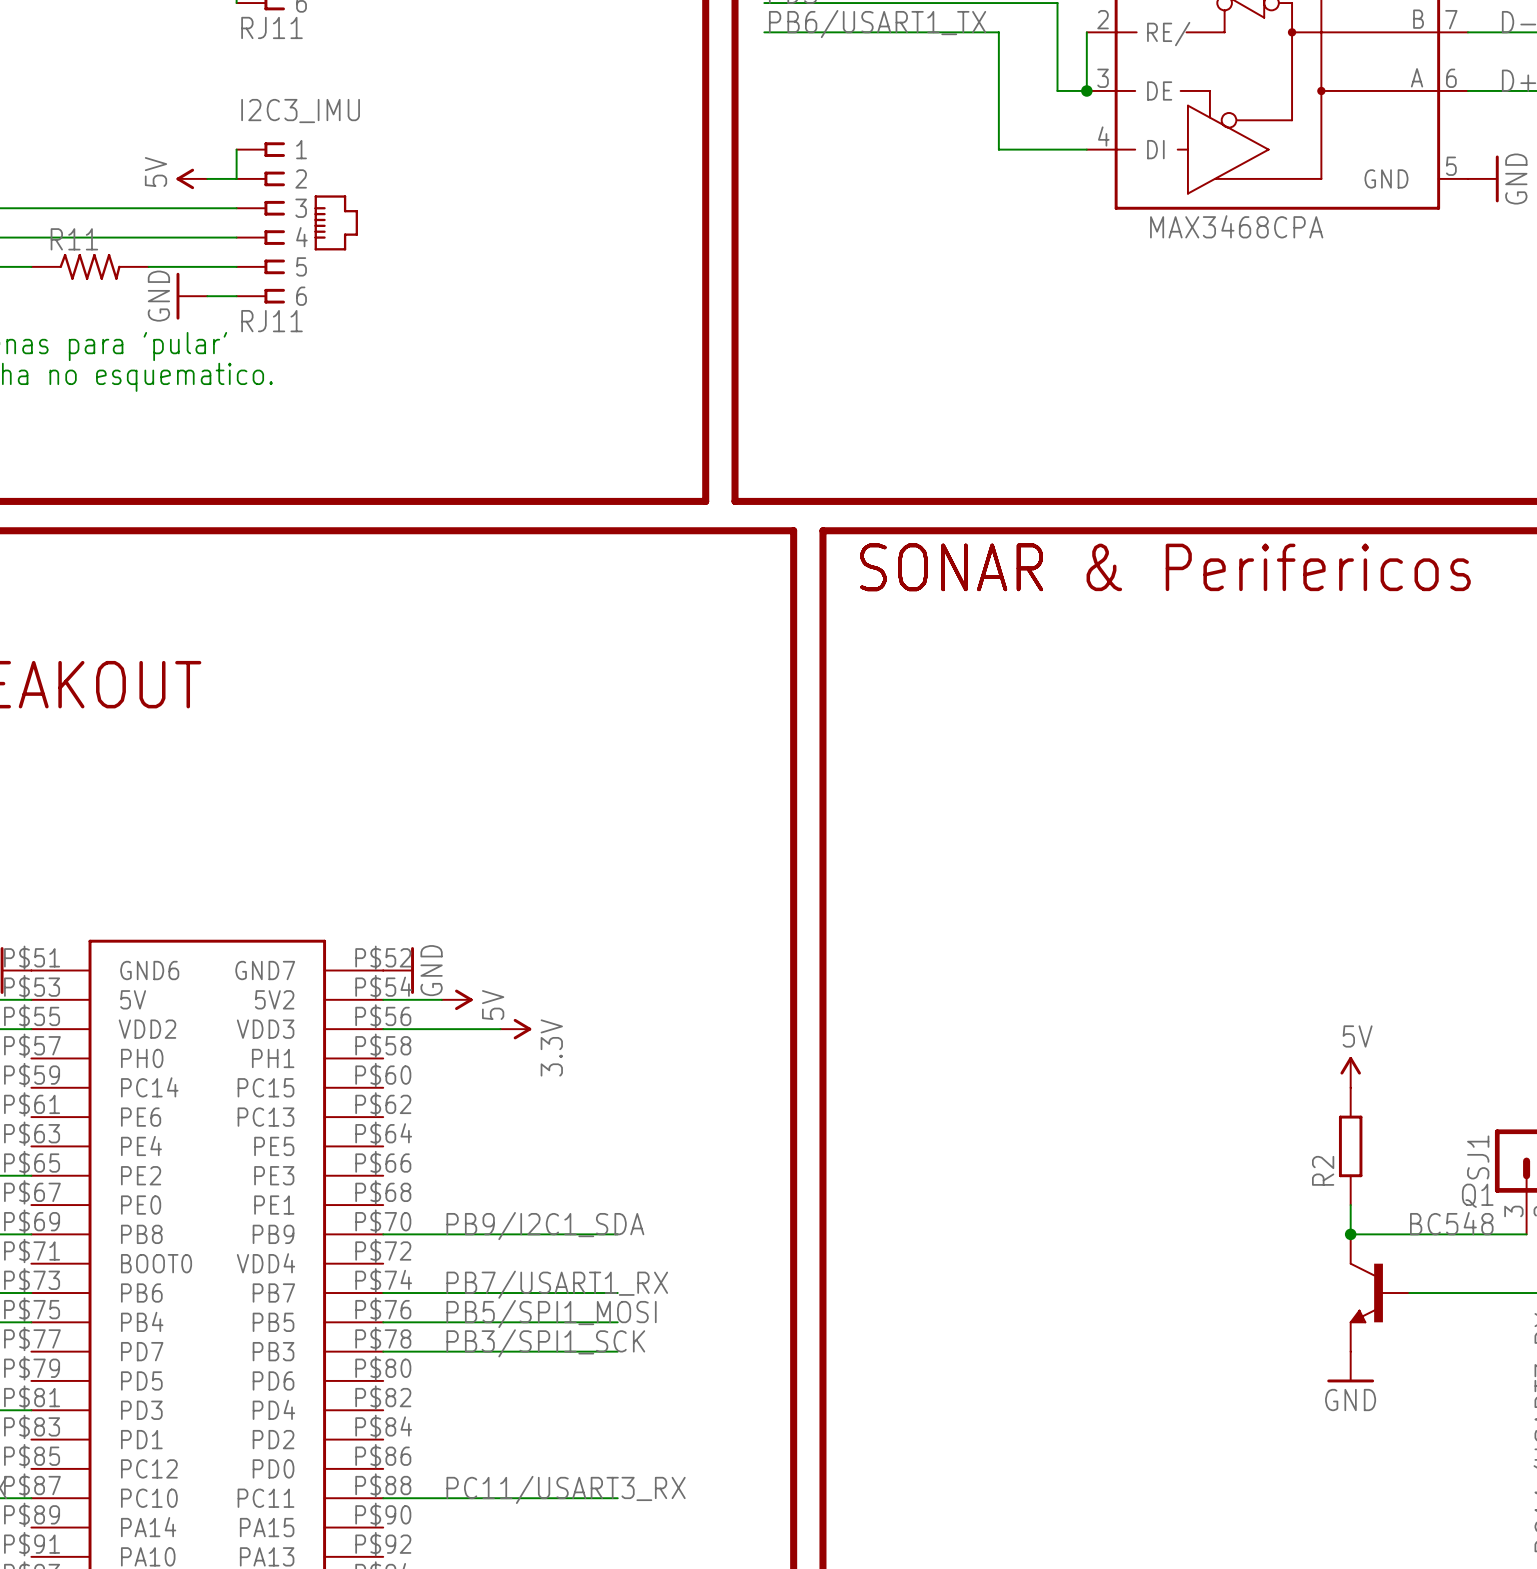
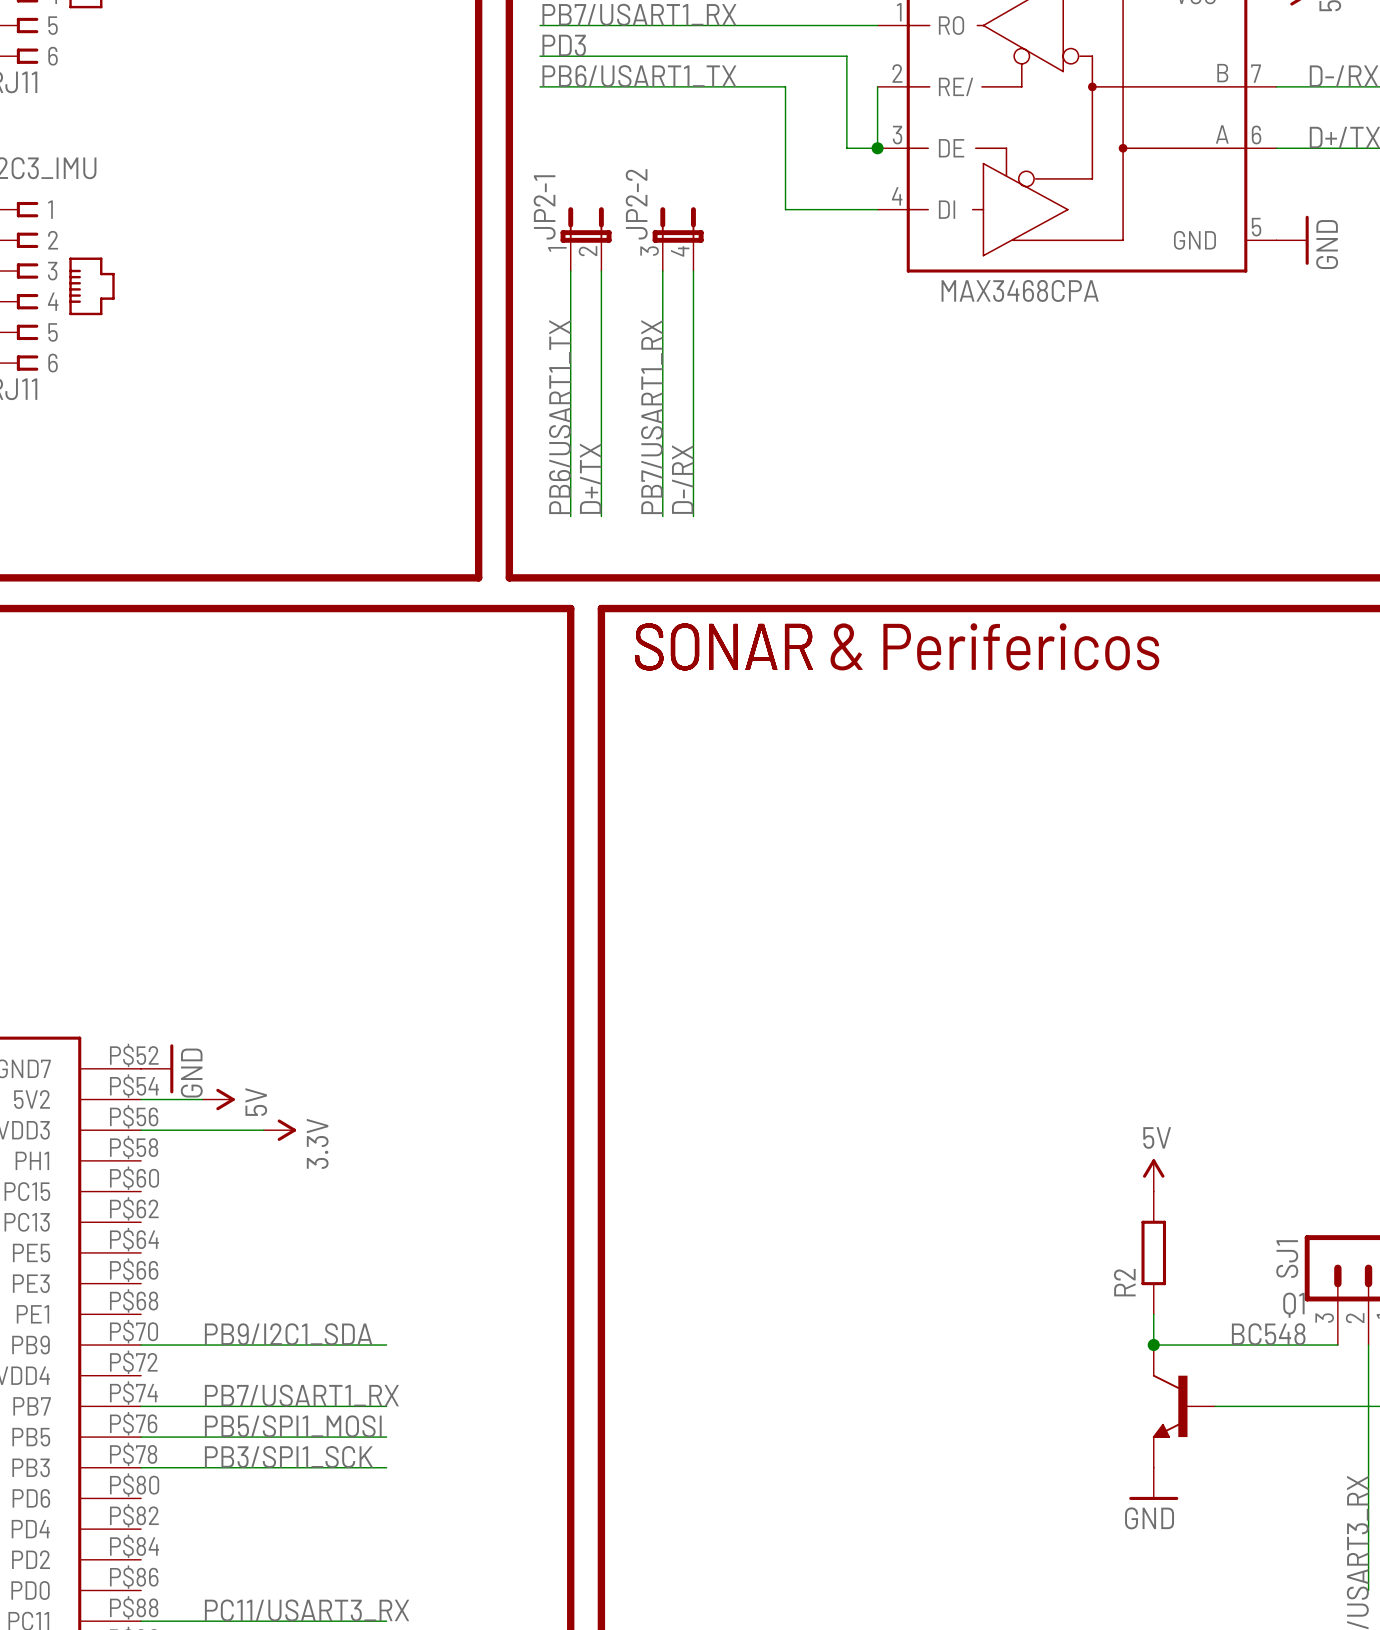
JP2-1: none -> (586, 239)
JP2-2: none -> (678, 239)
wire: none -> (570, 271) (570, 516)
wire: none -> (601, 271) (601, 516)
wire: none -> (662, 271) (662, 516)
wire: none -> (693, 271) (693, 516)
label: none -> PB7/USART1_RX (652, 417)
label: none -> PB6/USART1_TX (559, 417)
label: none -> D-/RX (682, 479)
label: none -> D+/TX (590, 478)

